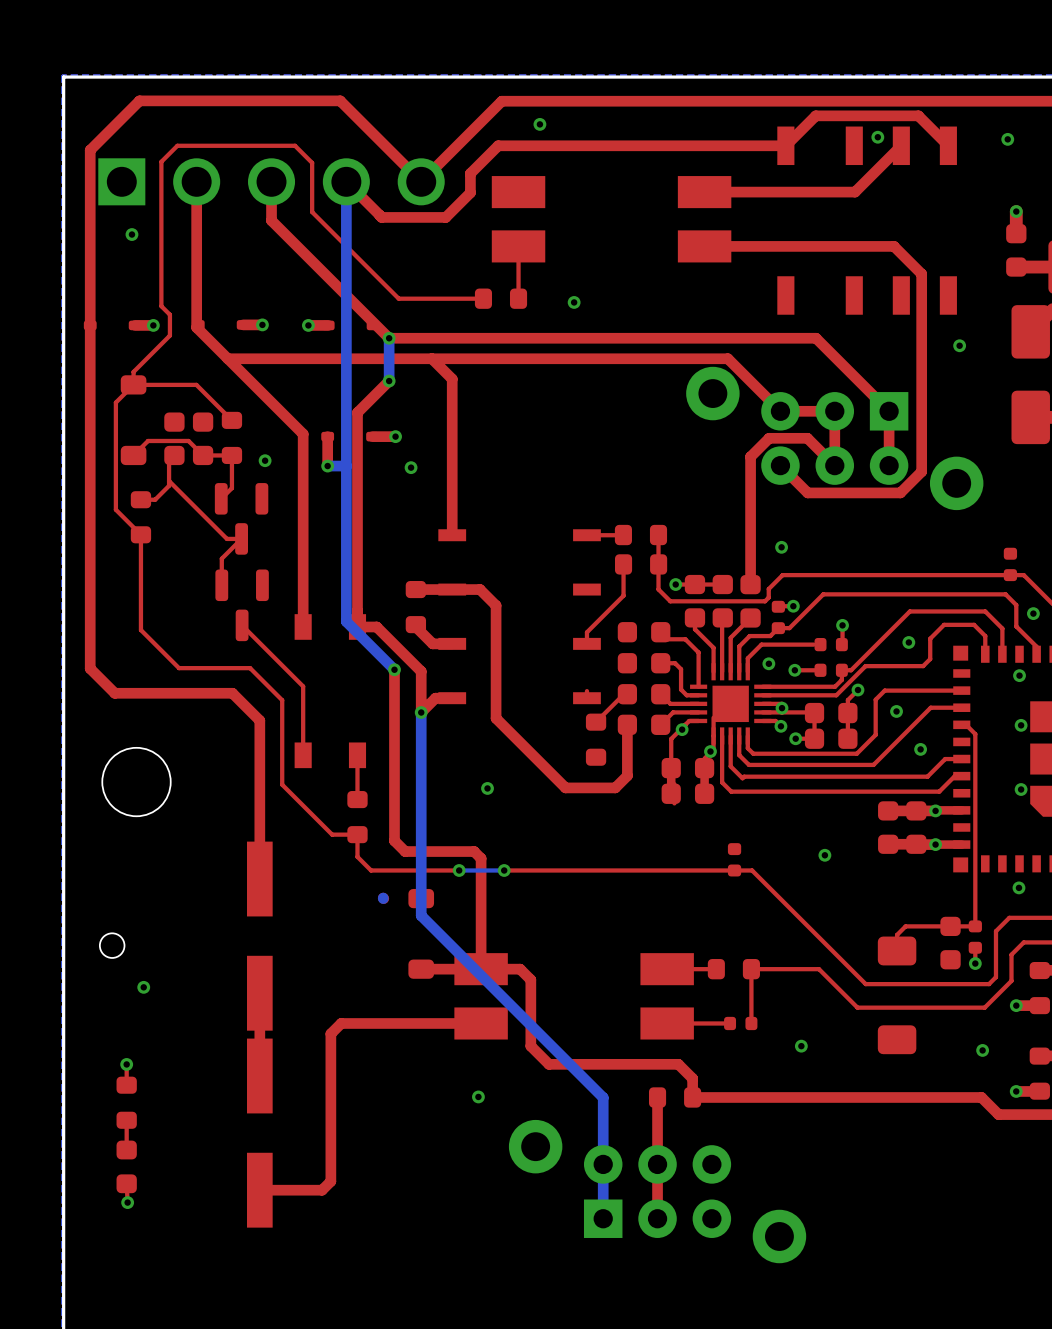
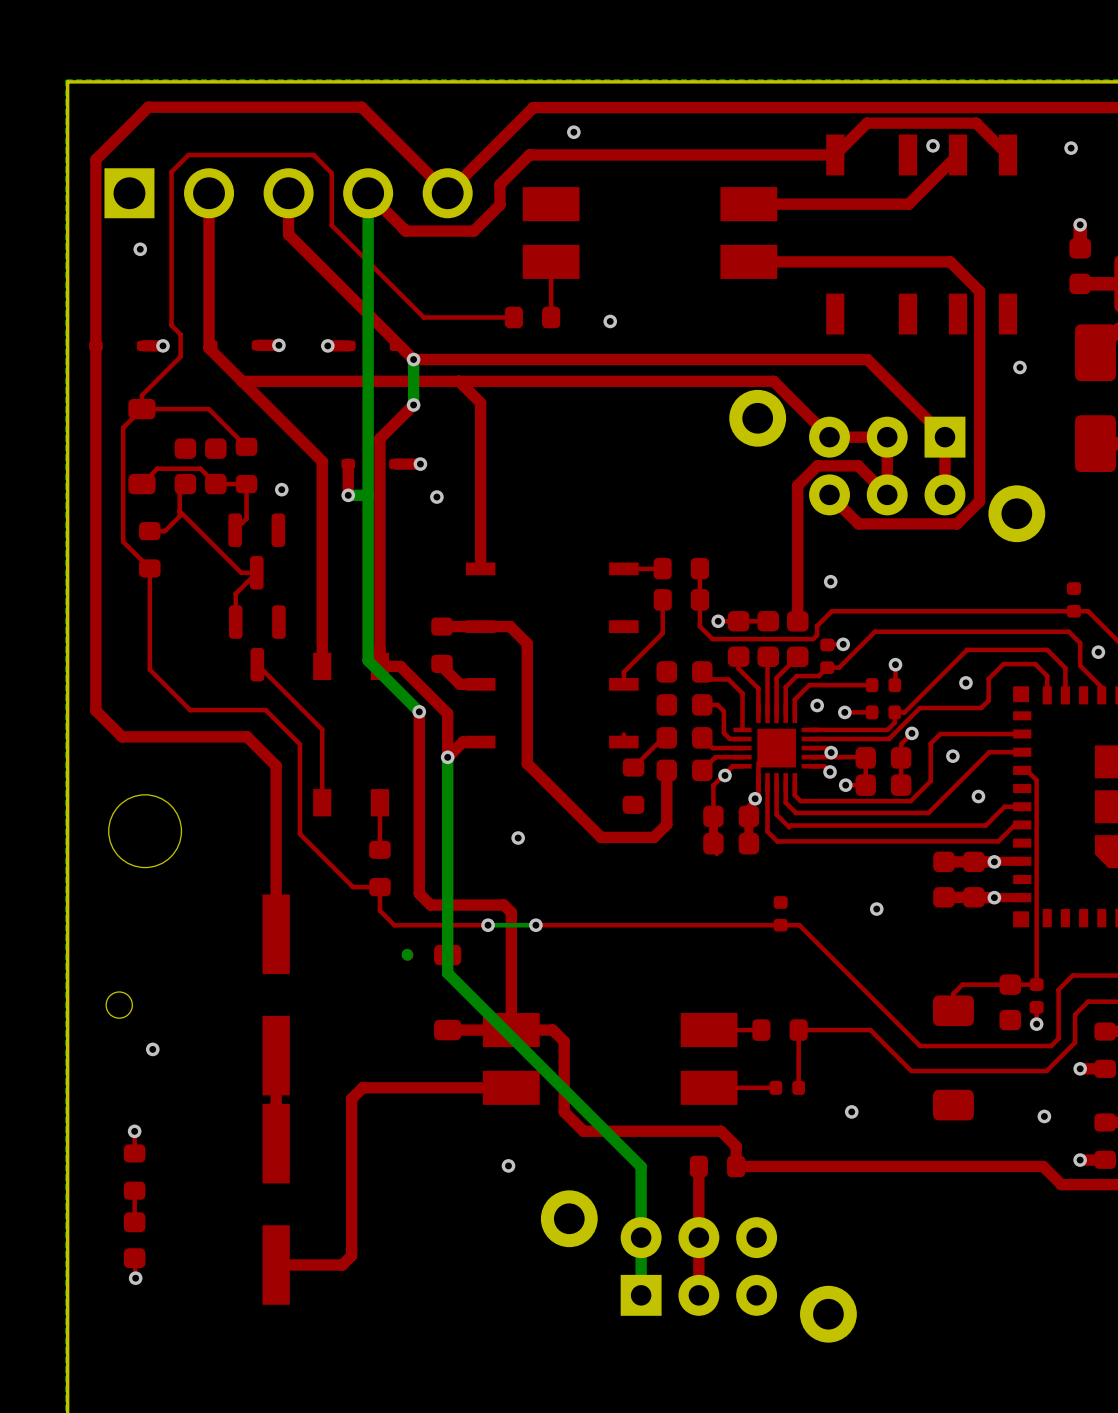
via: (1019, 675) -> none
via: (1021, 725) -> none
via: (1021, 789) -> none
via: (1018, 887) -> none

